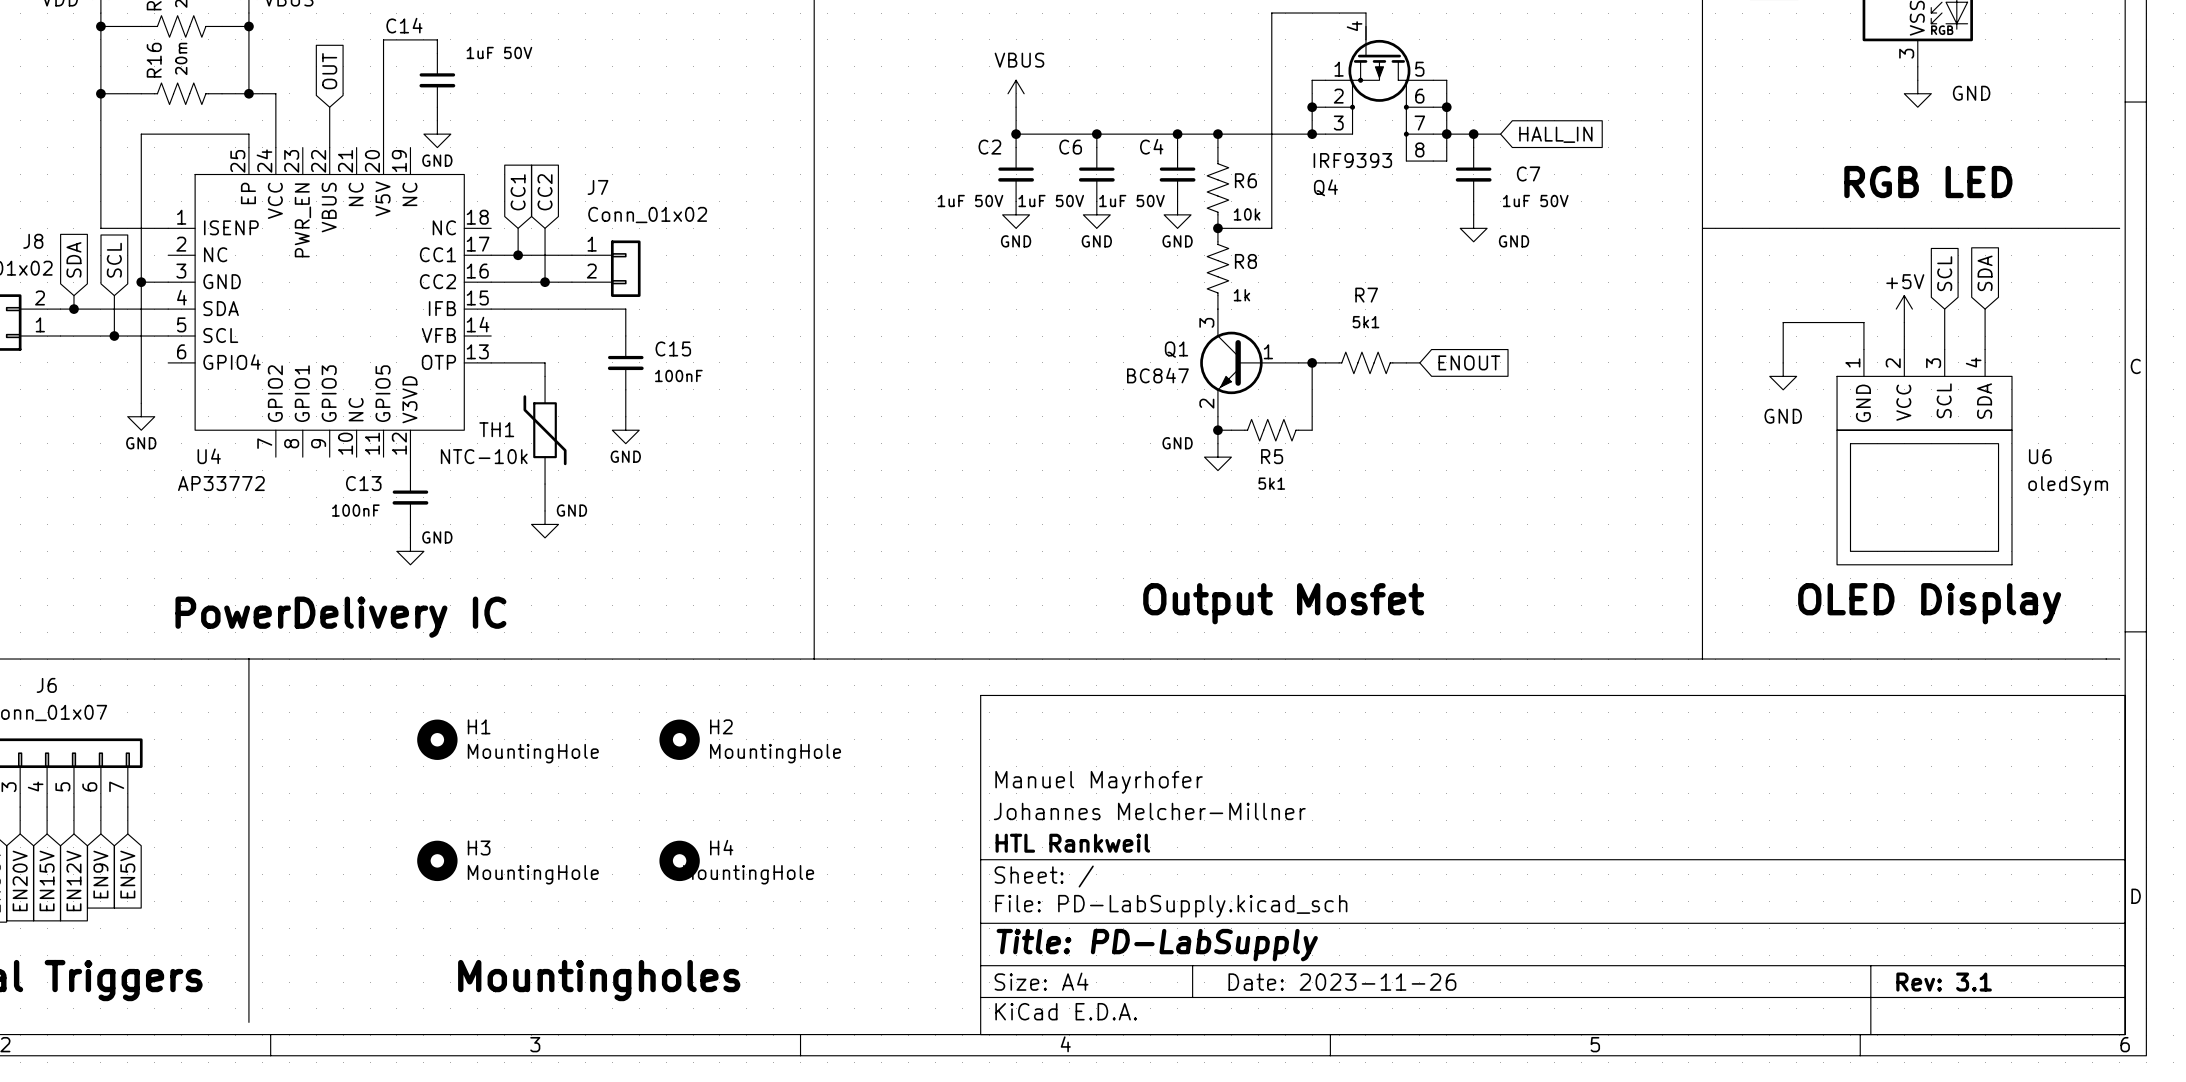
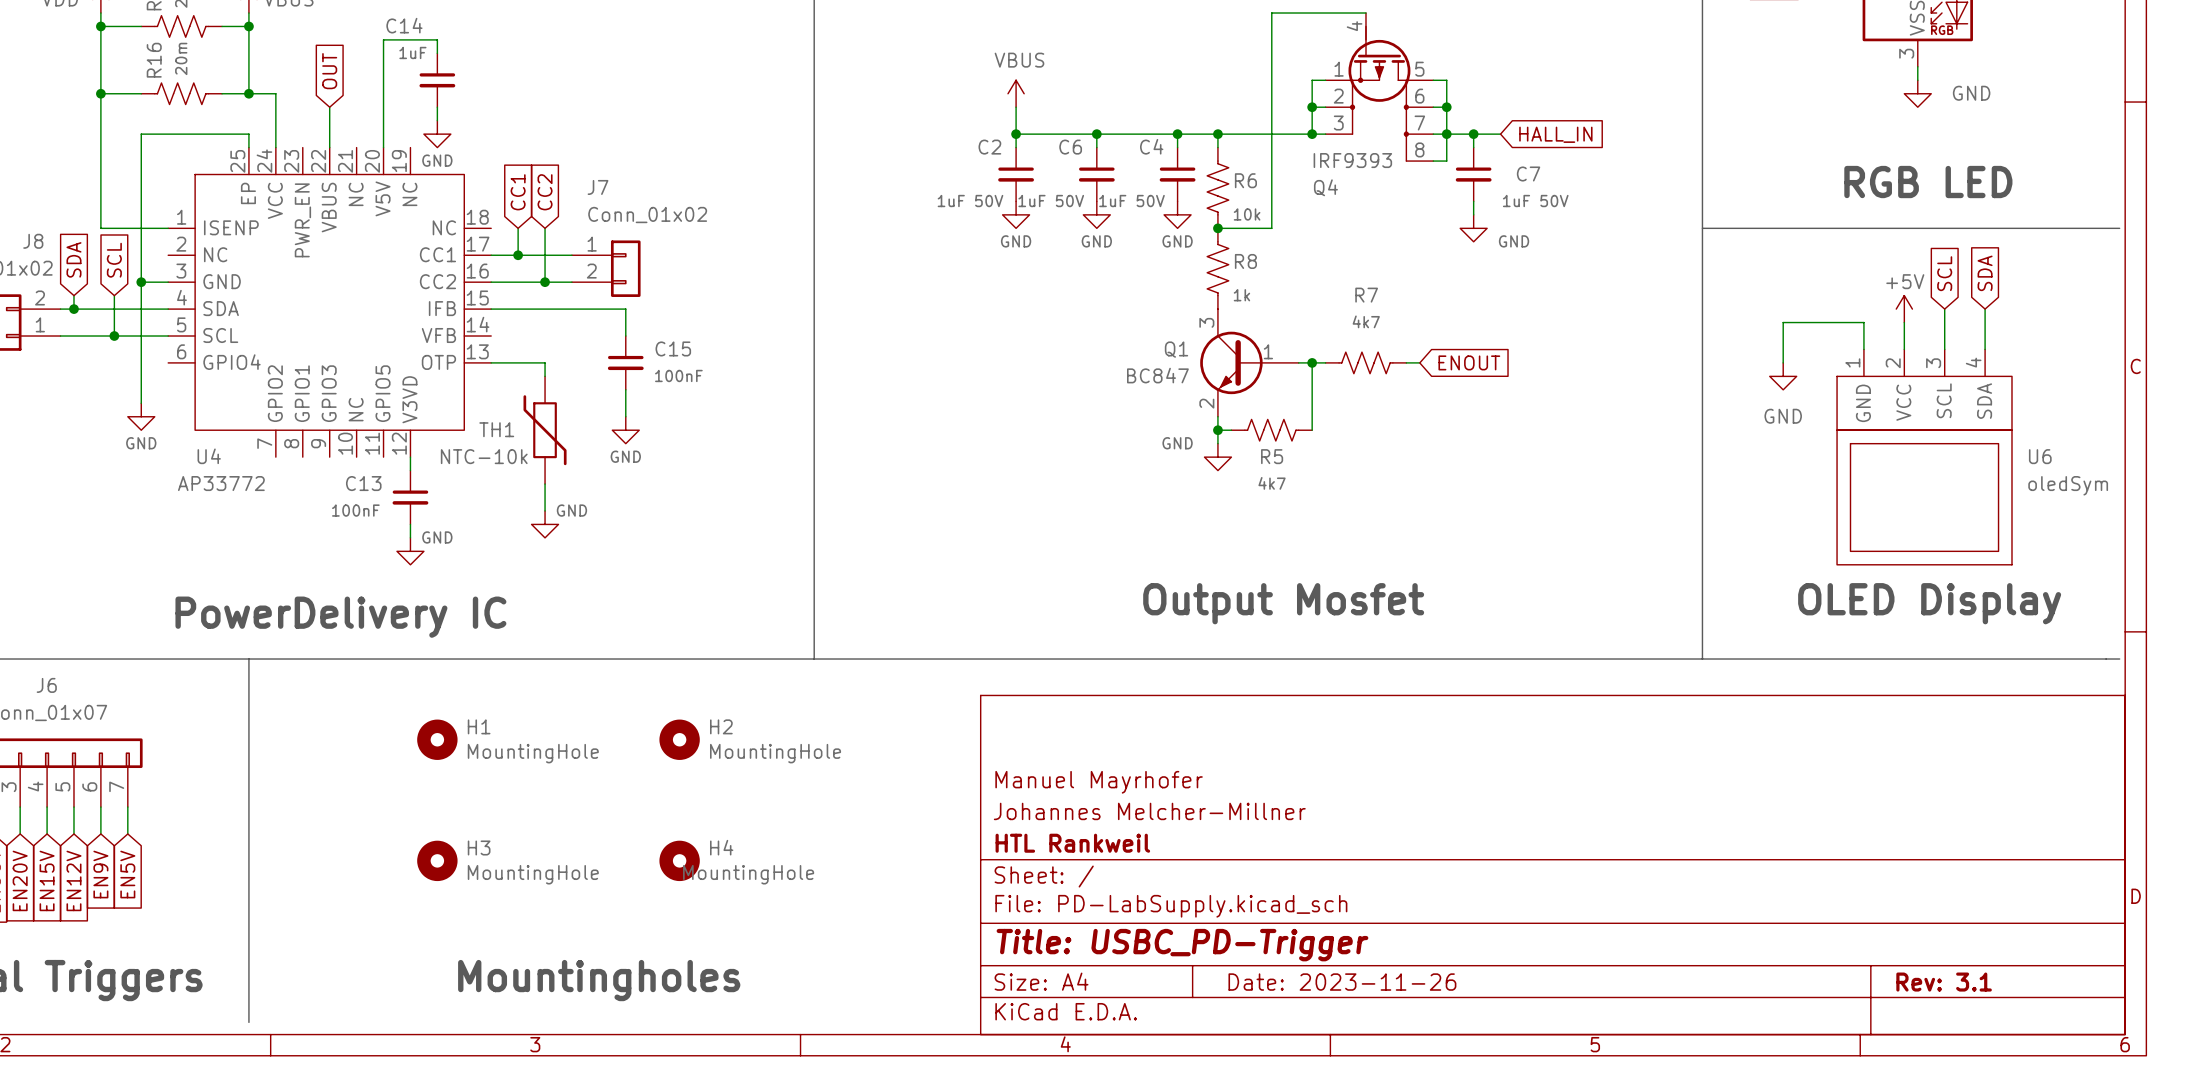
C14 value: 1uF 50V (499, 52) -> 1uF (412, 52)
R7 value: 5k1 (1365, 322) -> 4k7 (1366, 321)
R5 value: 5k1 (1271, 483) -> 4k7 (1272, 483)
title block: Title: PD-LabSupply (1157, 945) -> Title: USBC_PD-Trigger (1182, 945)

